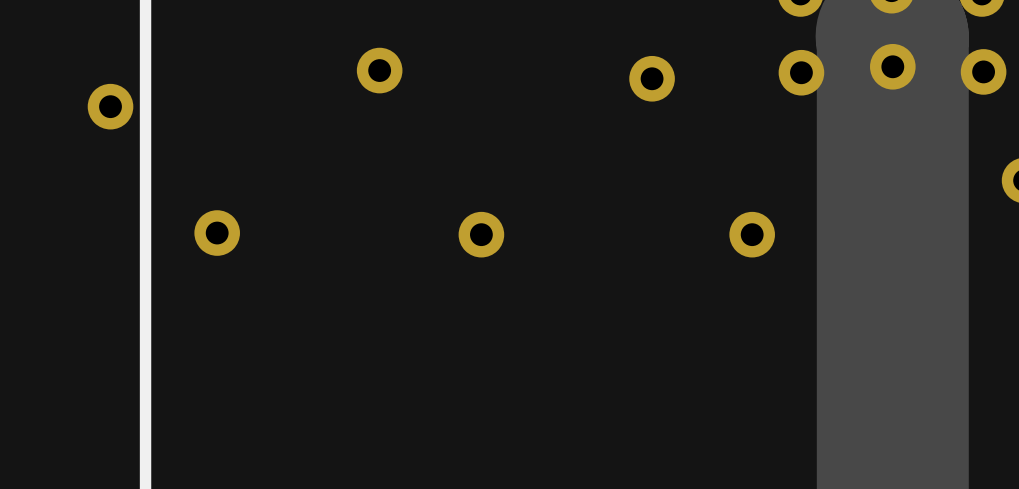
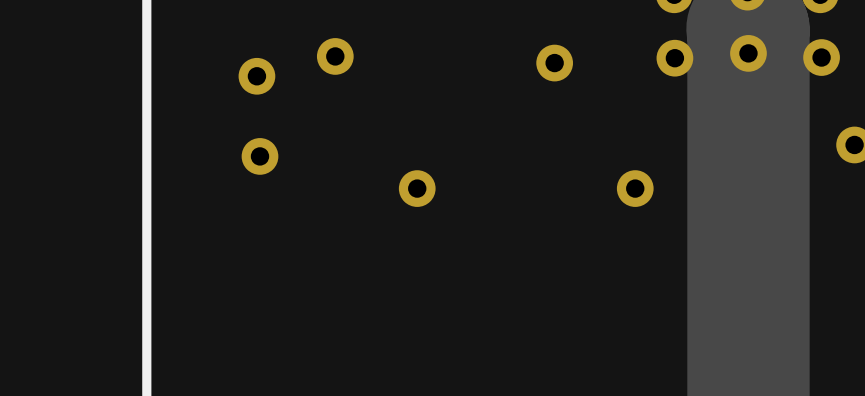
via: none -> (256, 76)
via: (110, 106) -> none
via: none -> (260, 156)
via: (217, 233) -> none

